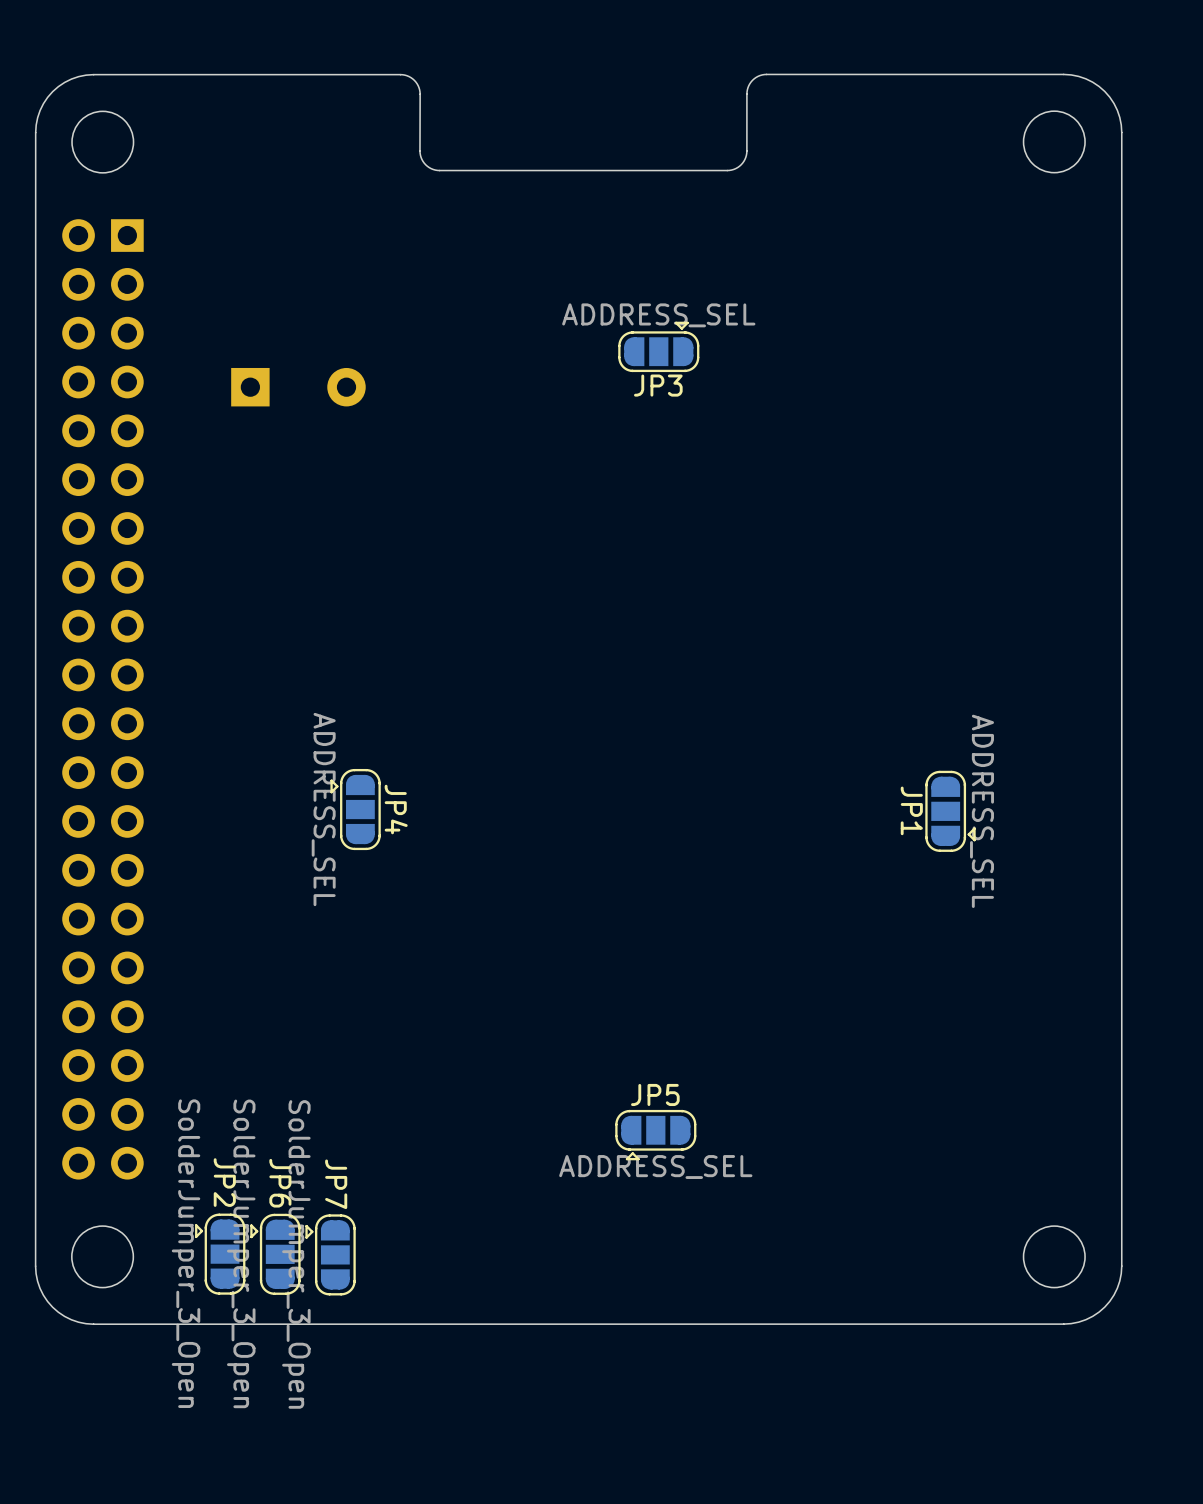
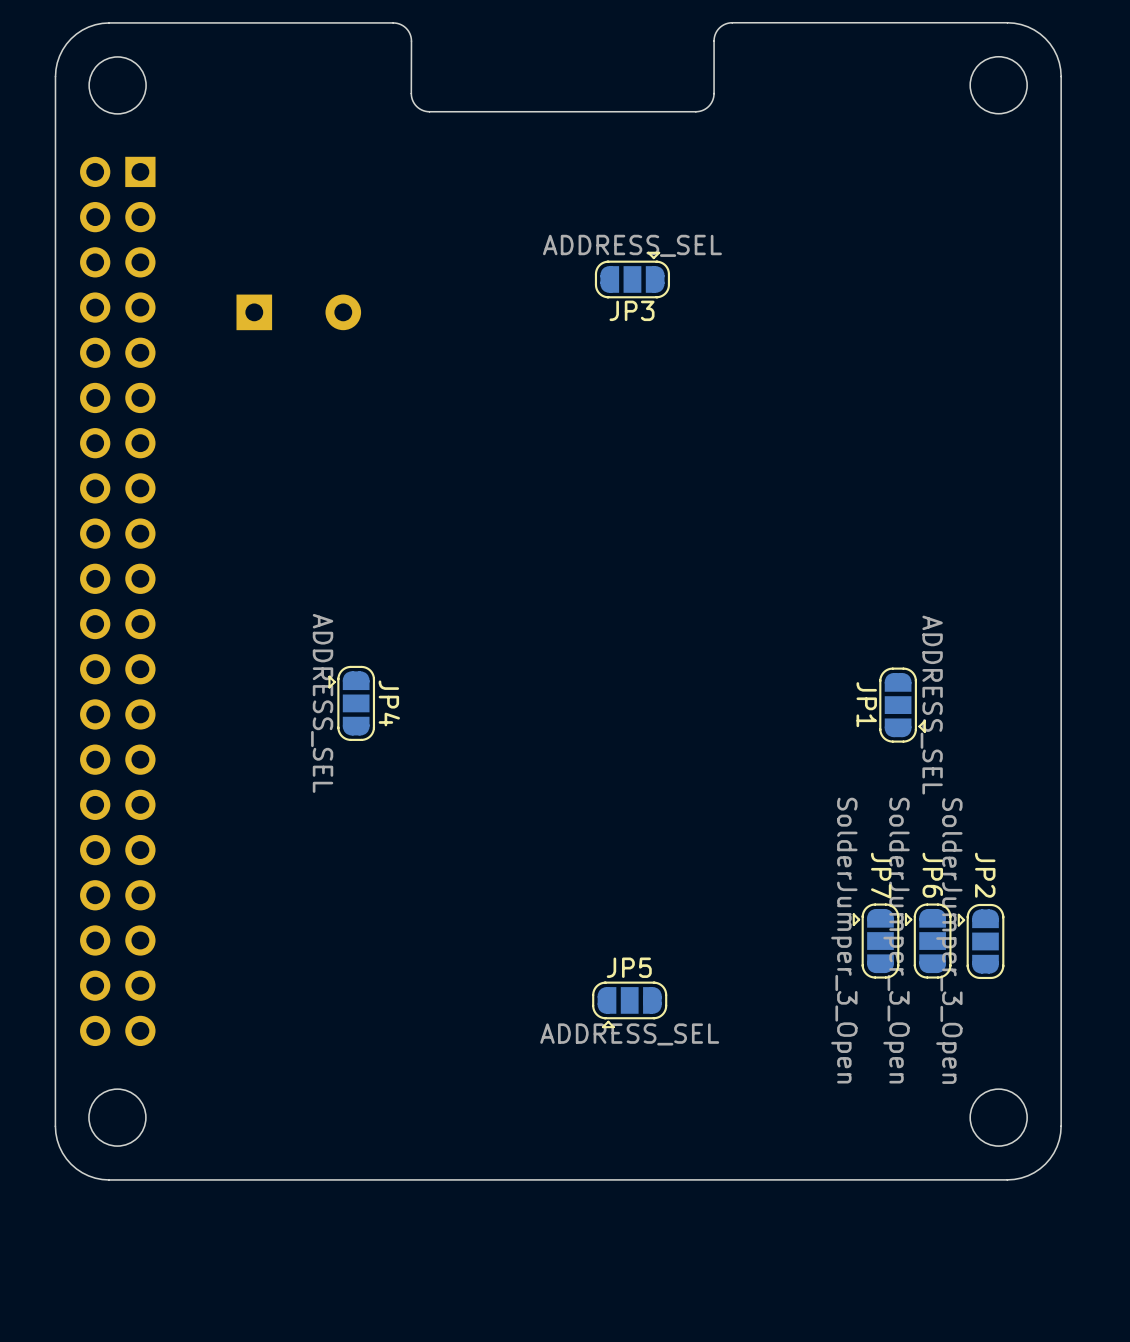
JP2 position: (220, 1254) -> (981, 941)
JP6 position: (275, 1254) -> (928, 941)
JP7 position: (330, 1254) -> (876, 941)

